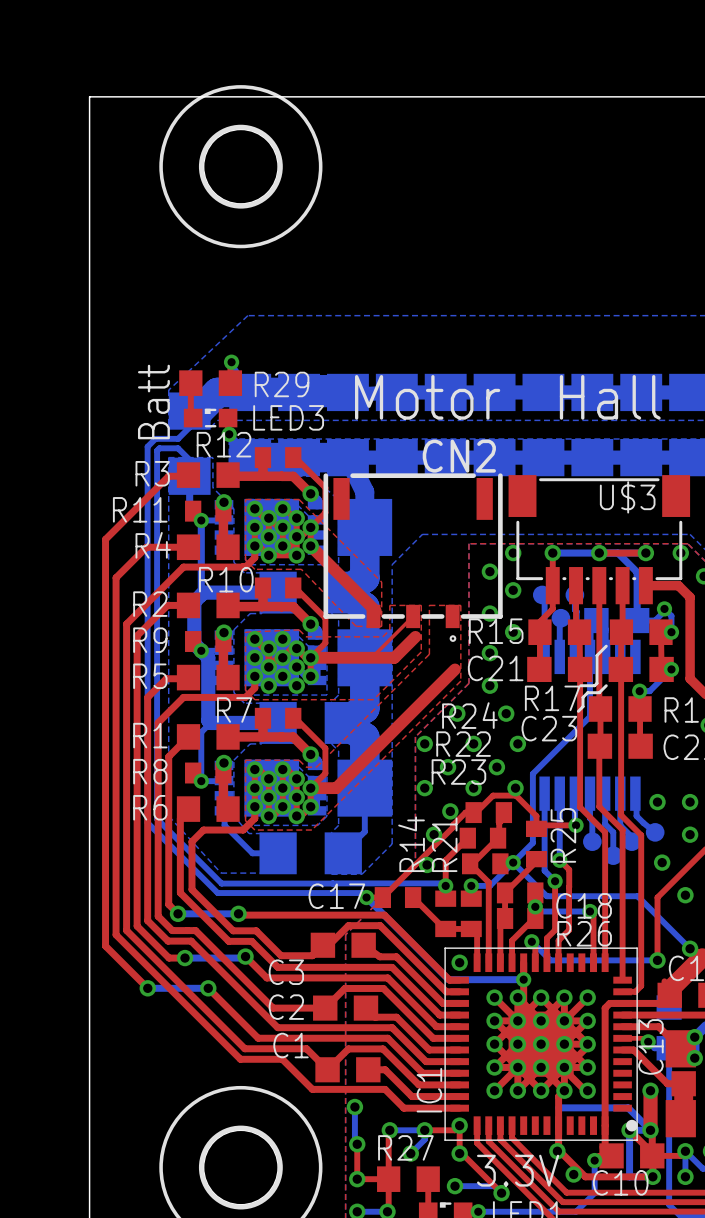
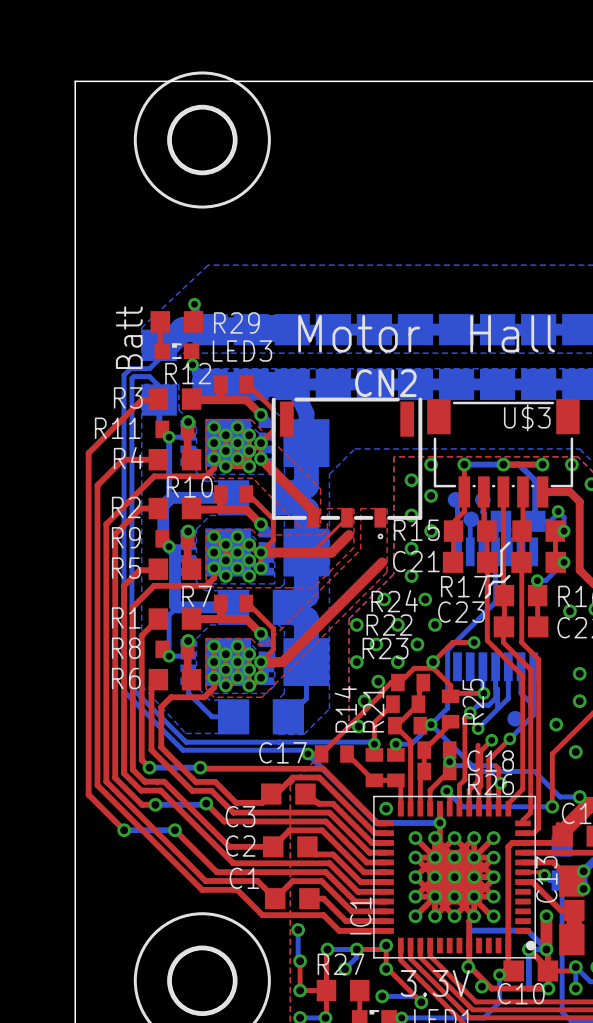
via: none -> (569, 611)
top track: (580, 762) (580, 807) (605, 832) (605, 956) -> (487, 640) (522, 675) (522, 789) (508, 803)
top track: none -> (474, 642) (452, 642) (433, 662)
via: none -> (474, 642)
top track: (599, 764) (599, 806) (622, 830) (622, 976) -> (503, 642) (530, 669) (530, 812) (523, 820)
top track: (621, 764) (621, 815) (641, 835) -> (521, 642) (538, 659) (538, 701)
bottom track: (544, 793) (544, 870) (555, 881) -> none
bottom track: (559, 793) (559, 860) -> none
bottom track: (635, 793) (636, 816) (655, 832) -> (533, 666) (533, 715) (509, 738)
via: (657, 802) -> none
bottom track: none -> (495, 688) (495, 698) (488, 705) (477, 705) (470, 712)
bottom track: (605, 824) (613, 832) (613, 855) -> (508, 692) (508, 698) (478, 728)
part: (655, 832) -> none
part: (592, 841) -> none
part: (631, 841) -> none
via: none -> (470, 712)
top track: (559, 860) (569, 869) (569, 887) -> none
via: (559, 860) -> none
via: none -> (478, 728)
top track: none -> (509, 738) (488, 759) (488, 808)
via: none -> (509, 738)
top track: (555, 881) (555, 930) (546, 938) -> (470, 712) (464, 718) (464, 779) (459, 785) (459, 788)
via: (555, 881) -> none
top track: none -> (491, 740) (480, 751) (479, 808)
via: none -> (491, 740)
bottom track: (546, 896) (637, 896) (690, 948) -> (459, 752) (477, 771) (534, 771) (560, 796) (579, 796)
via: (590, 911) -> none
via: none -> (500, 783)

